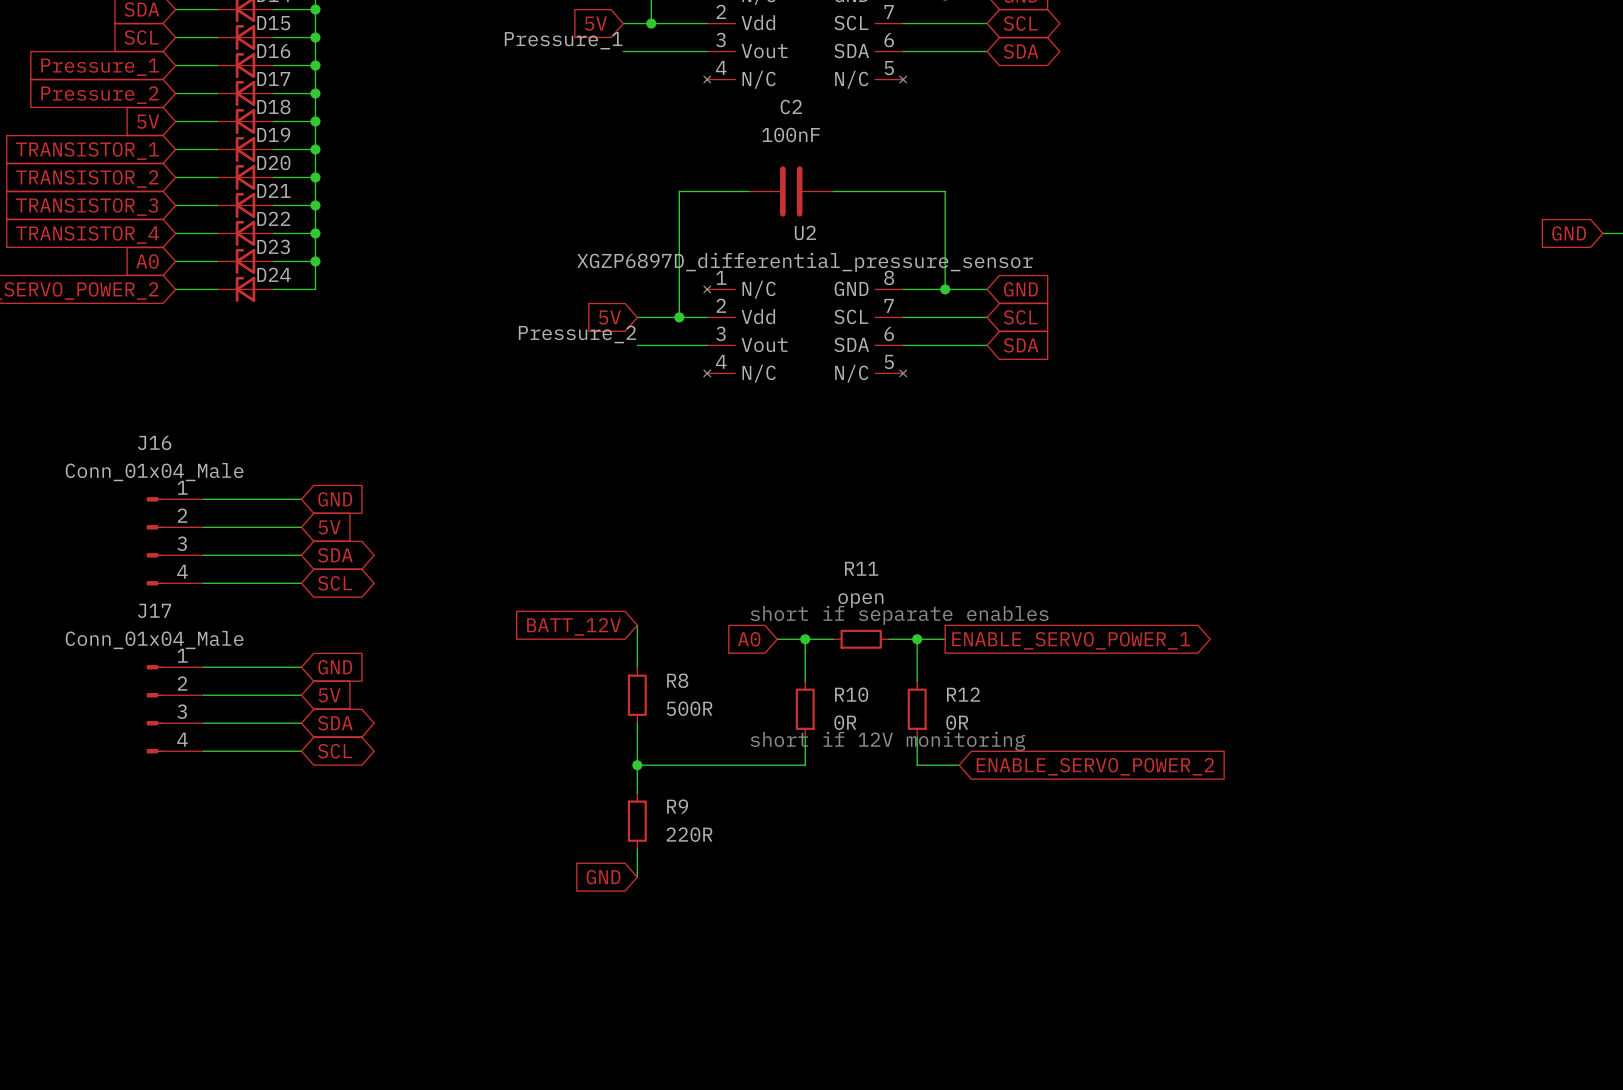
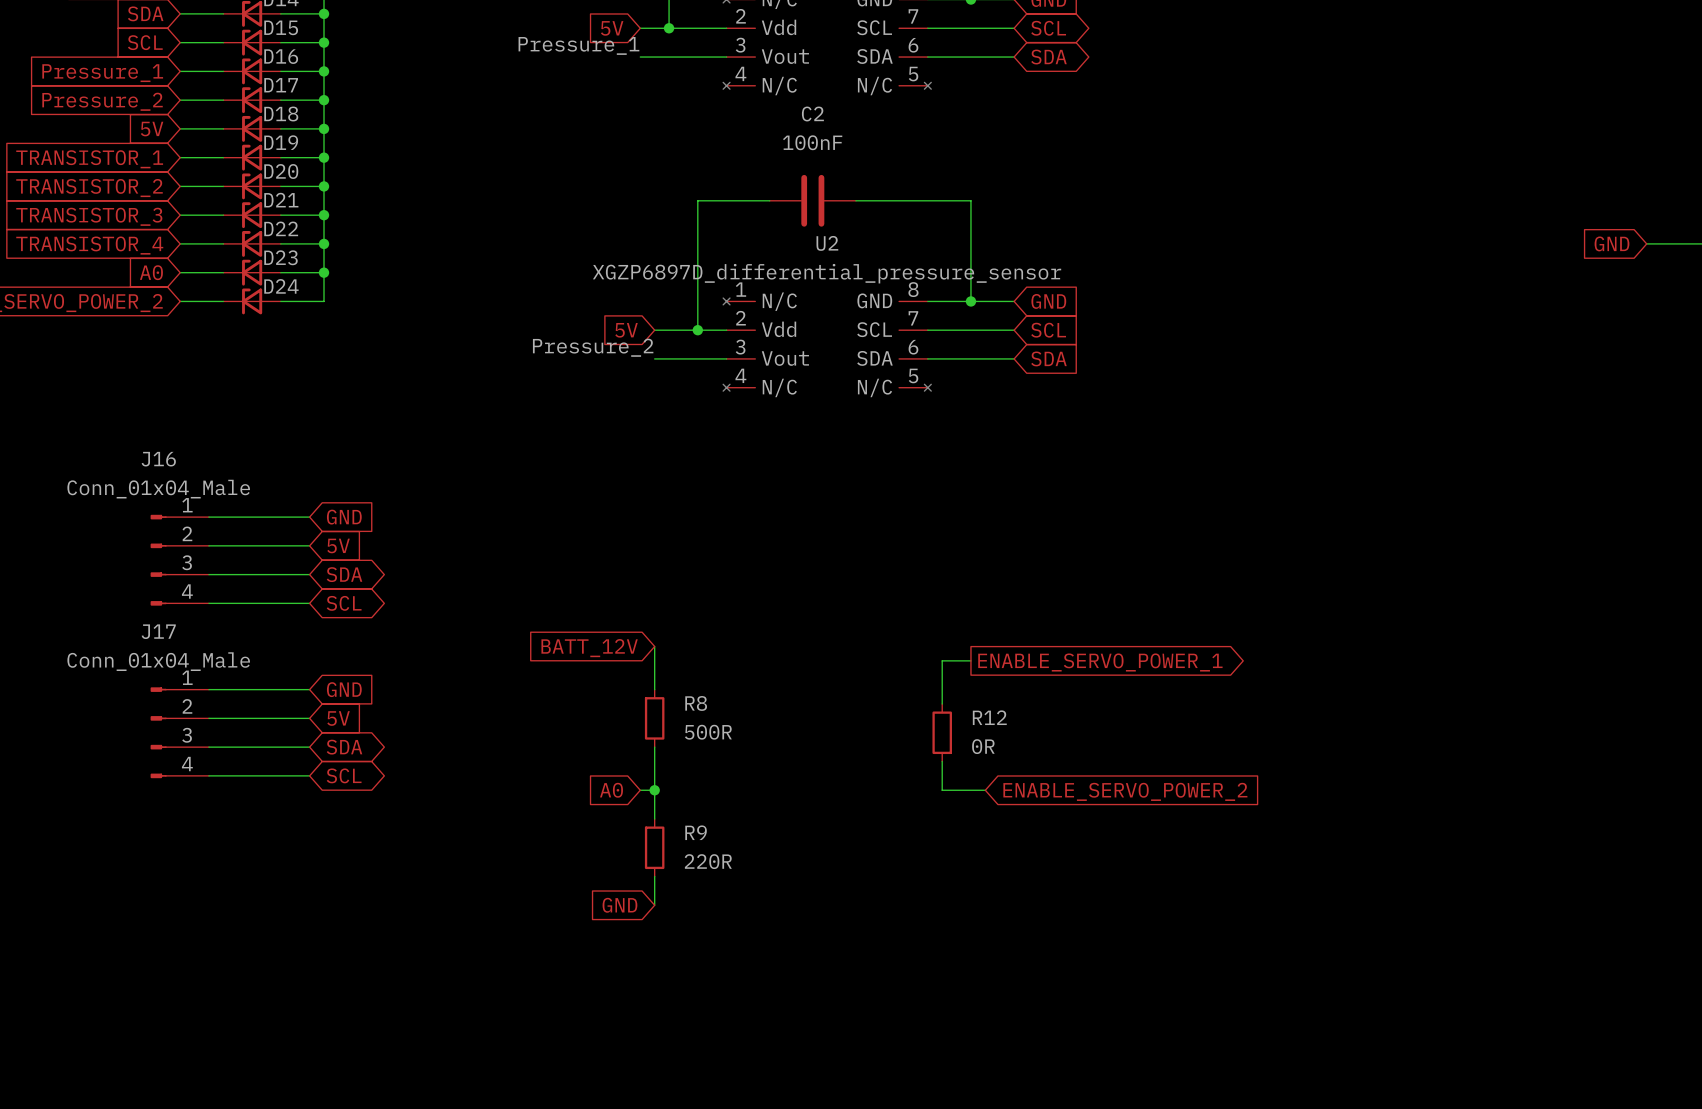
text: short if separate enables (899, 615) -> none
global label position: A0 (749, 639) -> A0 (611, 790)
wire: (777, 639) (833, 639) -> none
wire: (805, 639) (805, 681) -> none
junction: (805, 639) -> none
R11: open (861, 639) -> none
wire: (889, 639) (917, 639) -> none
junction: (917, 639) -> none
R10: 0R (805, 709) -> none
wire: (805, 737) (805, 765) (637, 765) -> (640, 790) (654, 790)
text: short if 12V monitoring (887, 741) -> none

